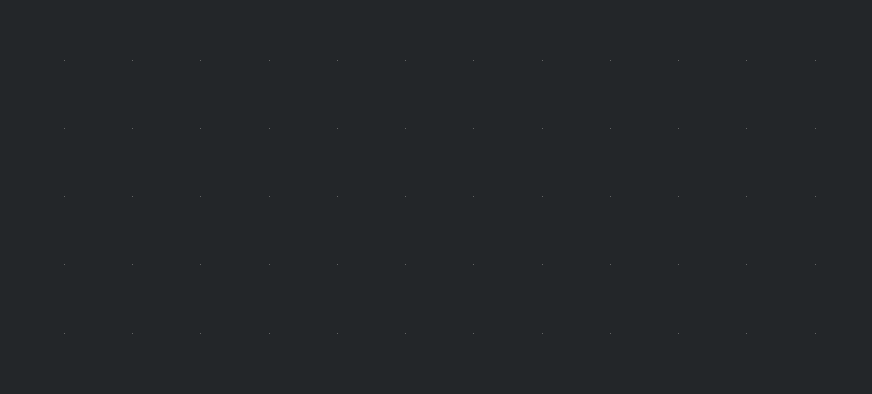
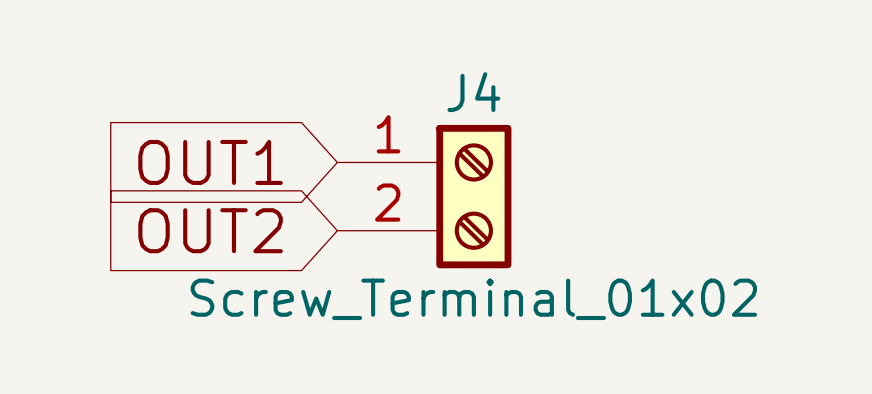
global label: none -> OUT1 (210, 162)
J4: none -> Screw_Terminal_01x02 (424, 196)
global label: none -> OUT2 (210, 230)

